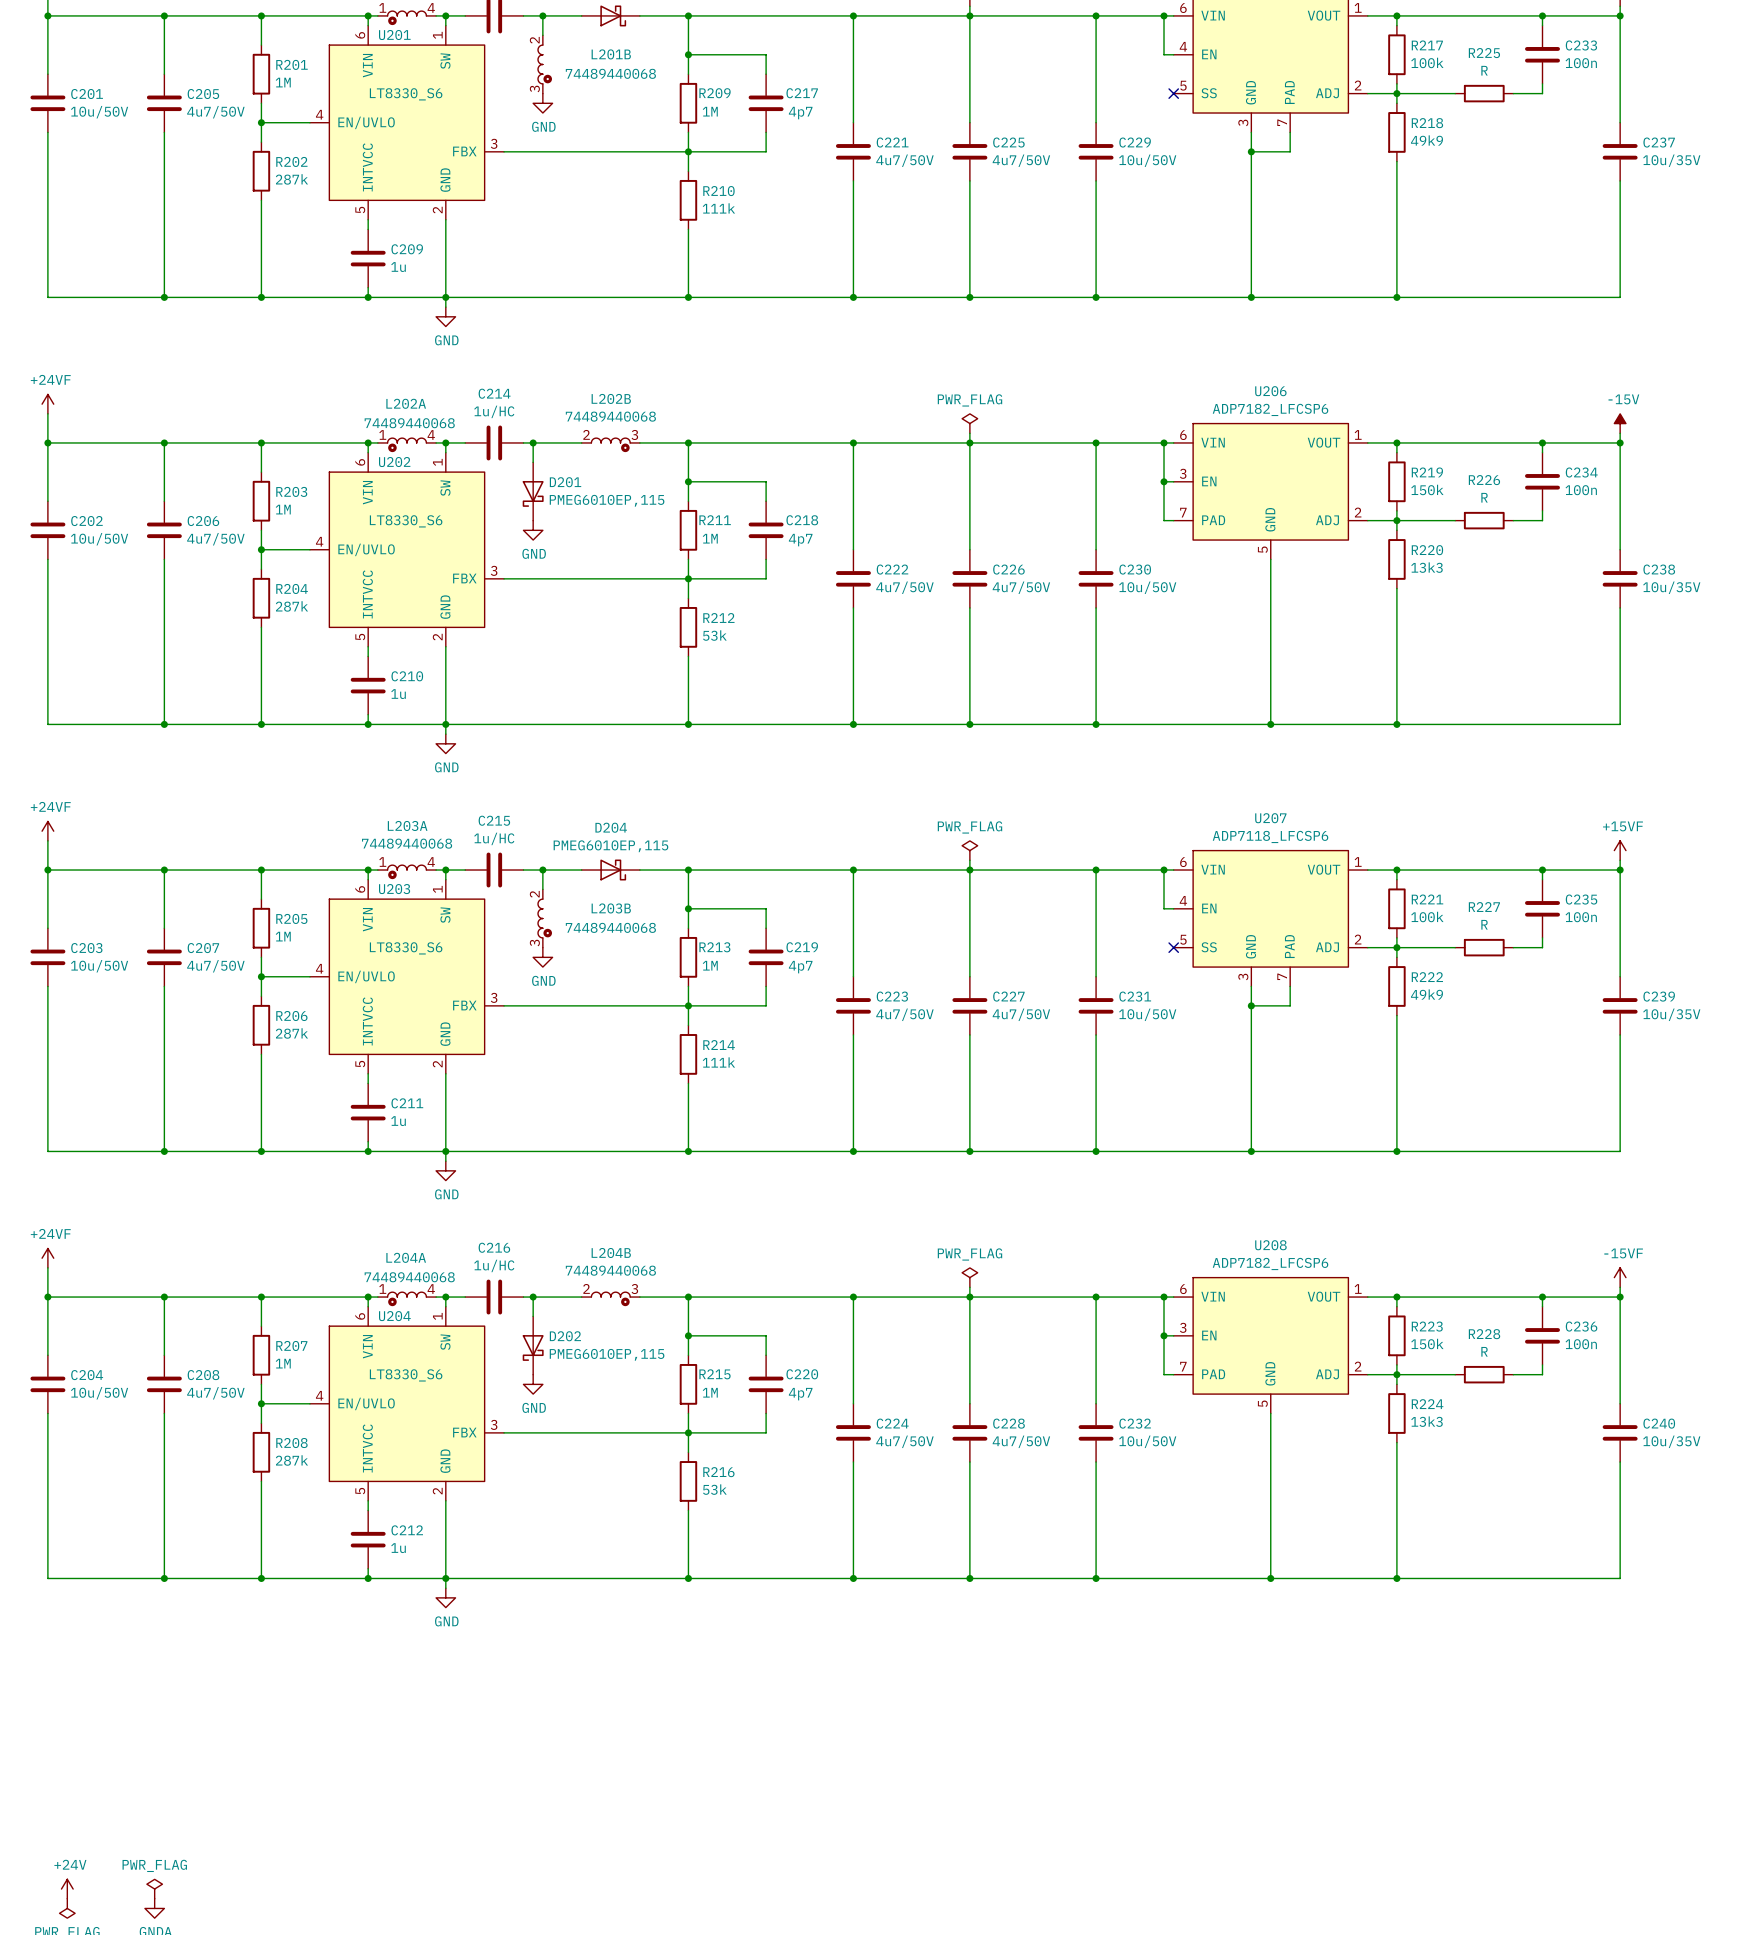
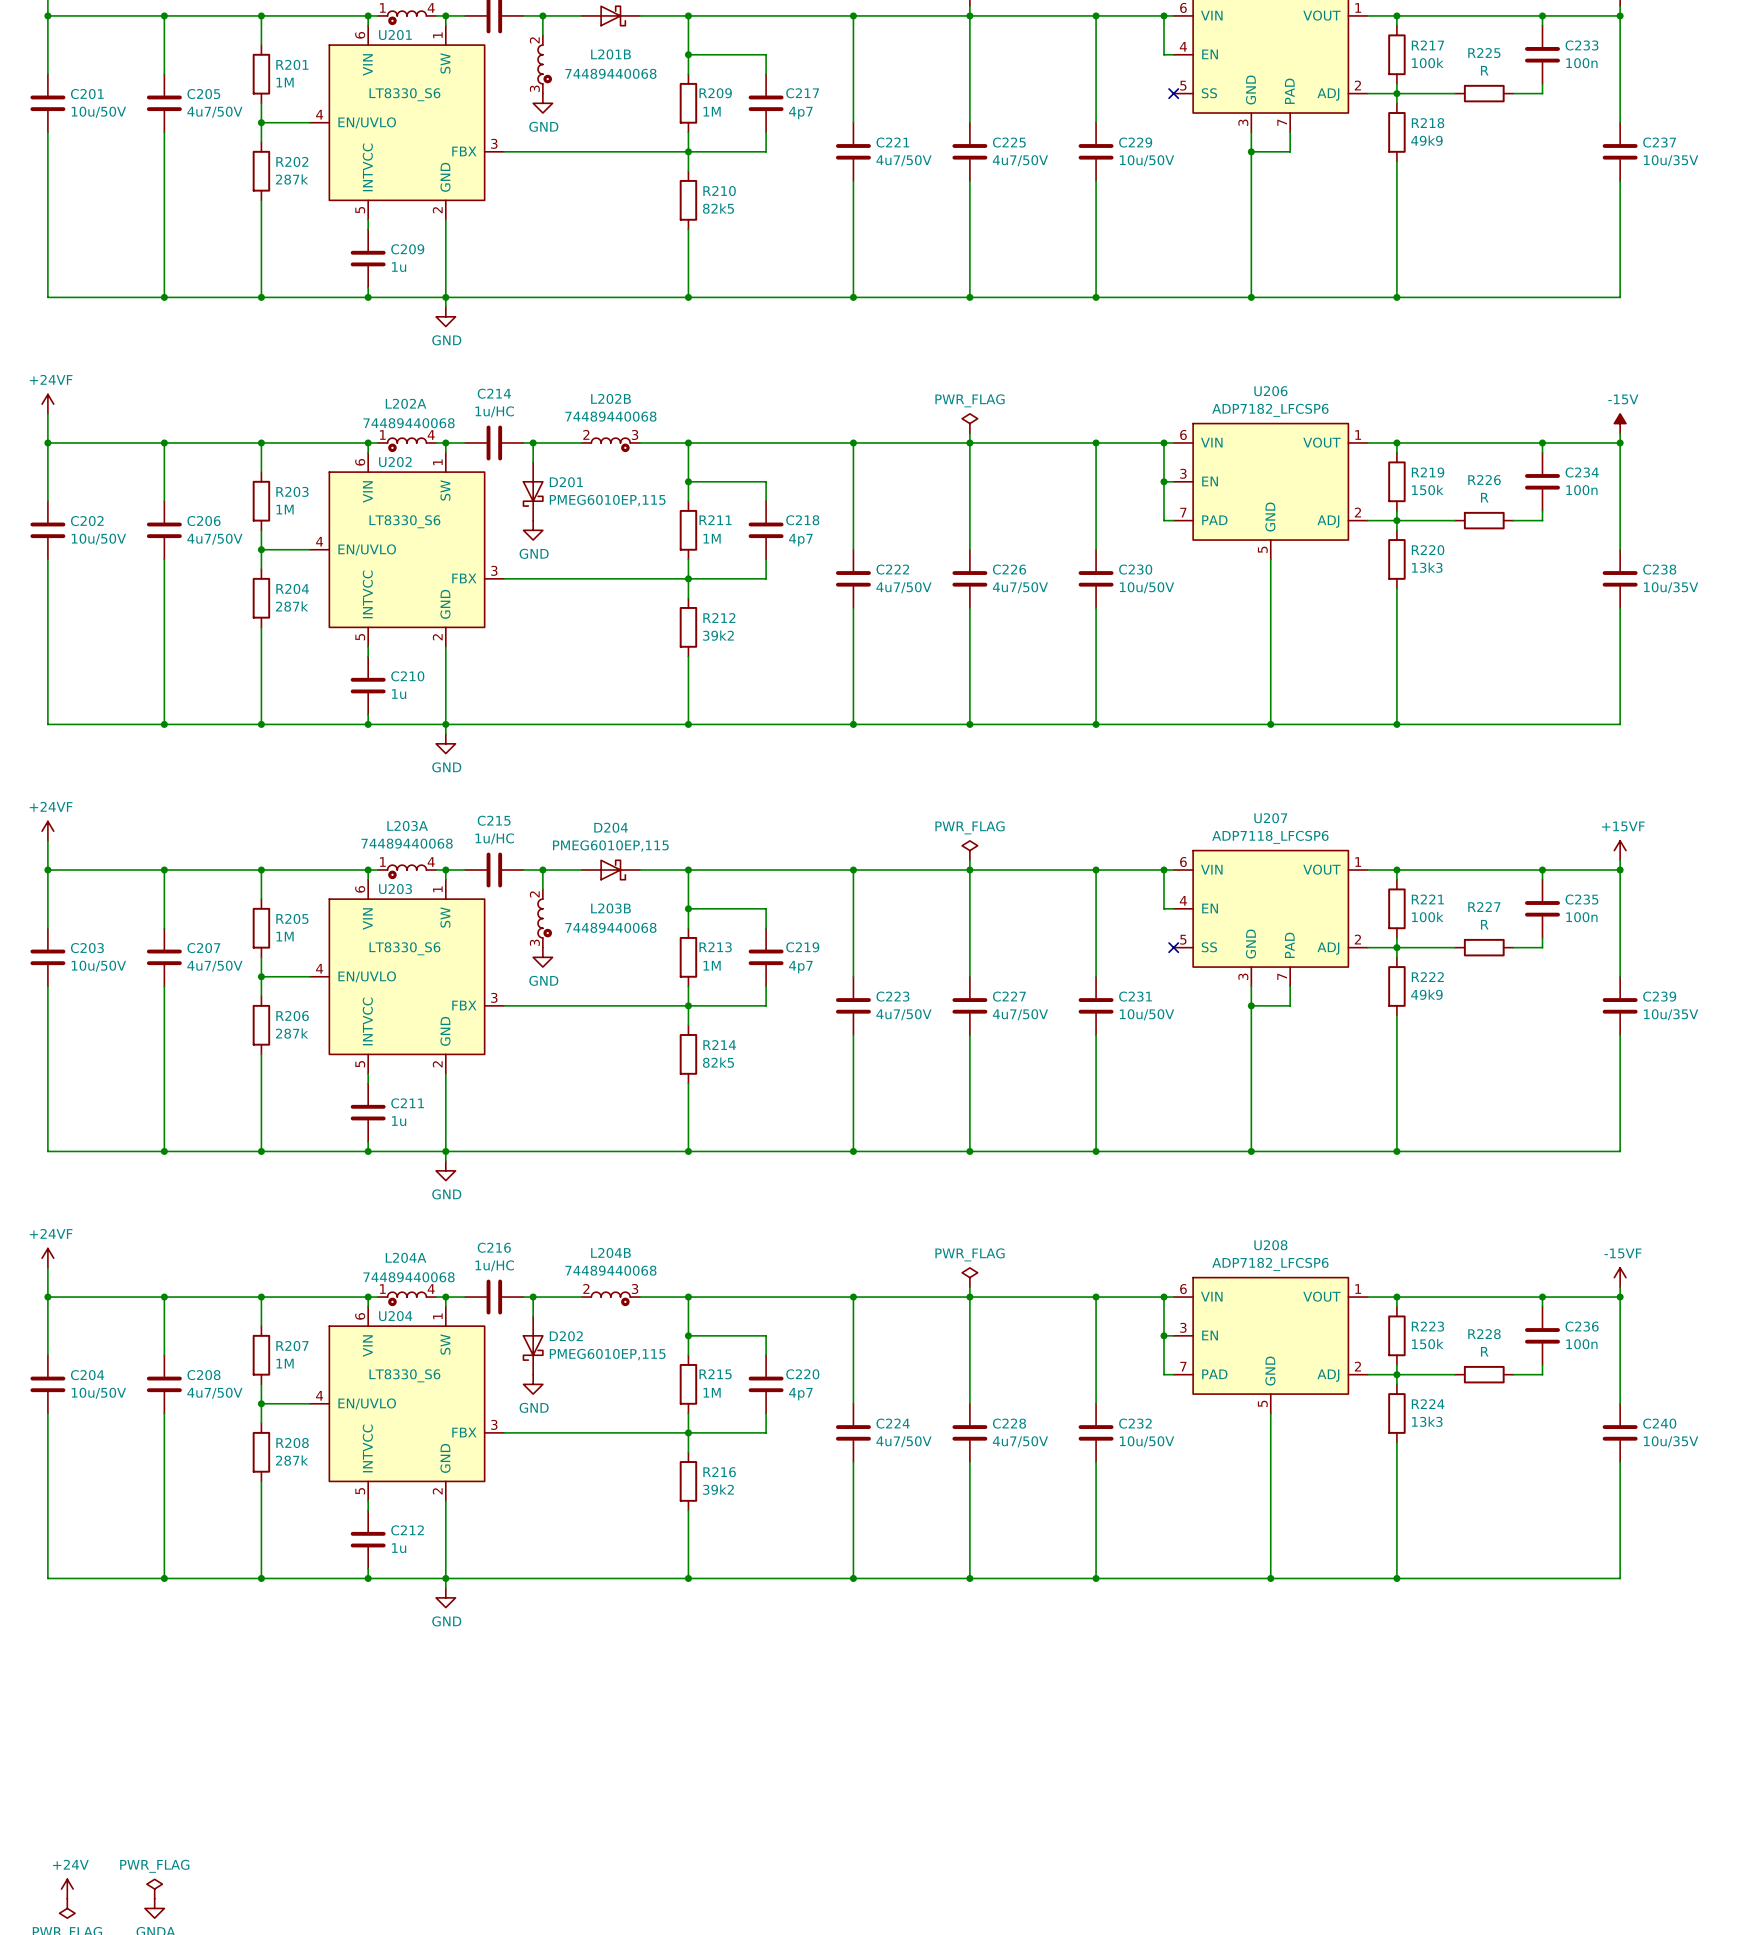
R210 value: 111k (718, 208) -> 82k5 (718, 208)
R212 value: 53k (714, 635) -> 39k2 (718, 635)
R214 value: 111k (718, 1062) -> 82k5 (718, 1062)
R216 value: 53k (714, 1489) -> 39k2 (718, 1489)

